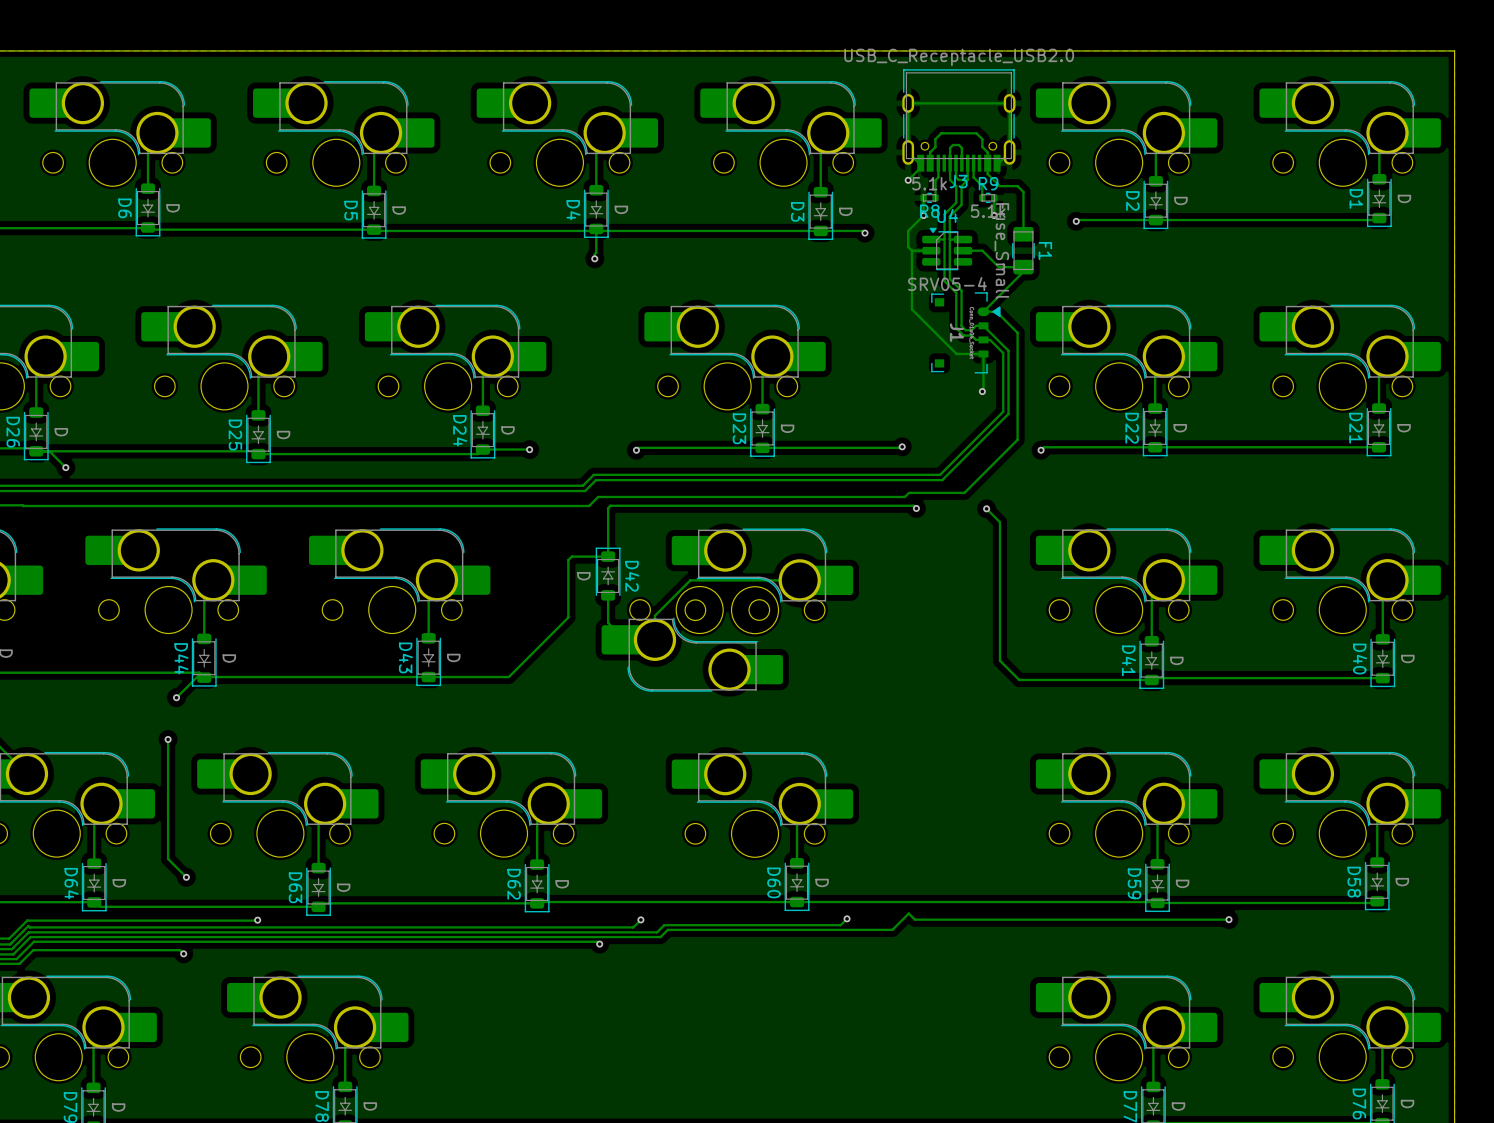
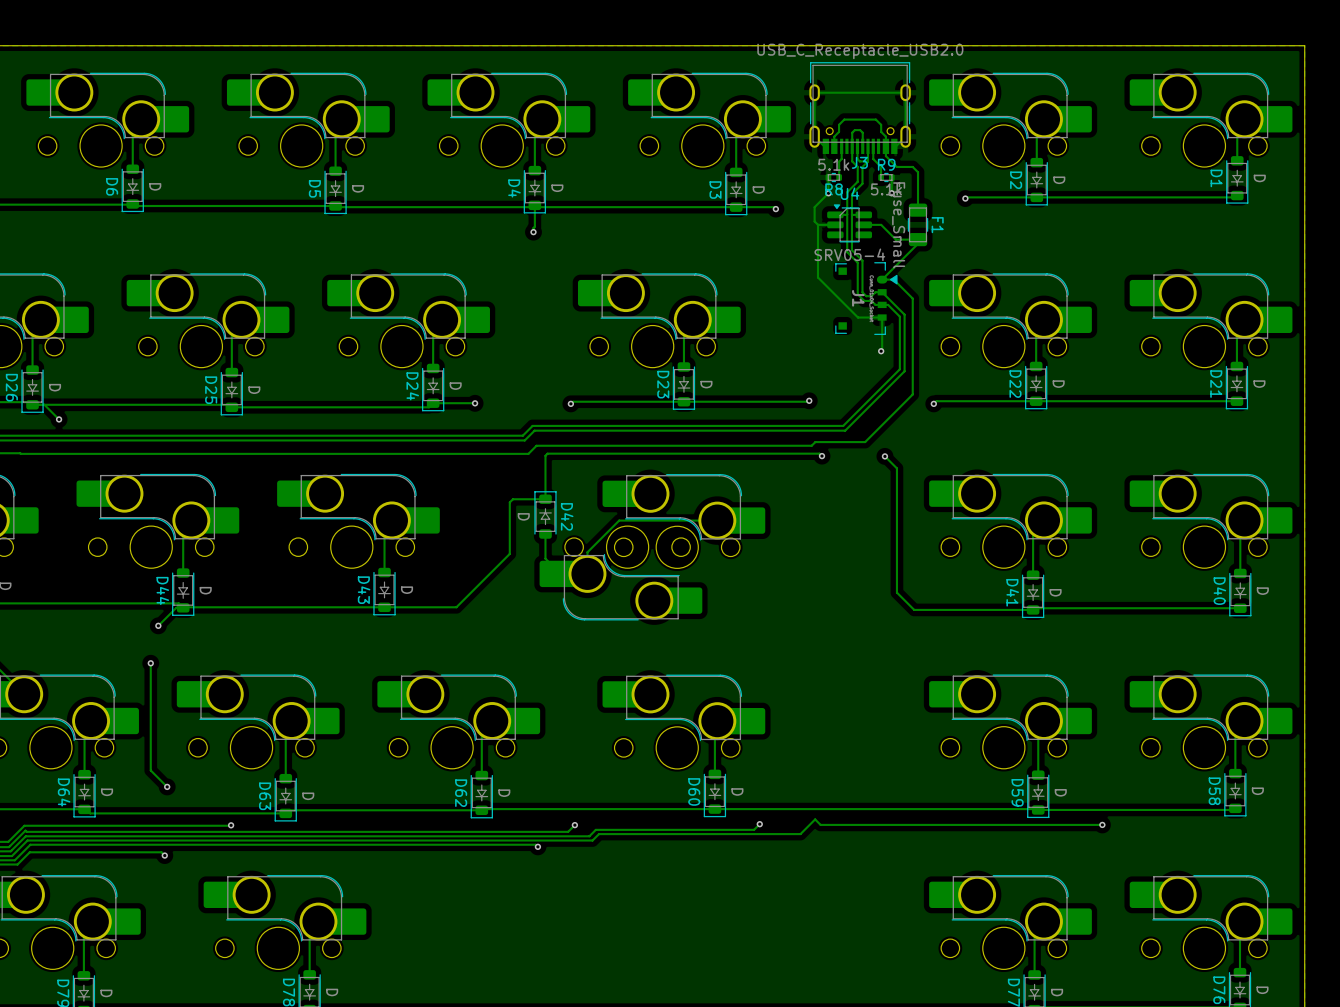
track: (920, 163) (920, 167) (908, 180) -> none
via: (908, 180) -> none

